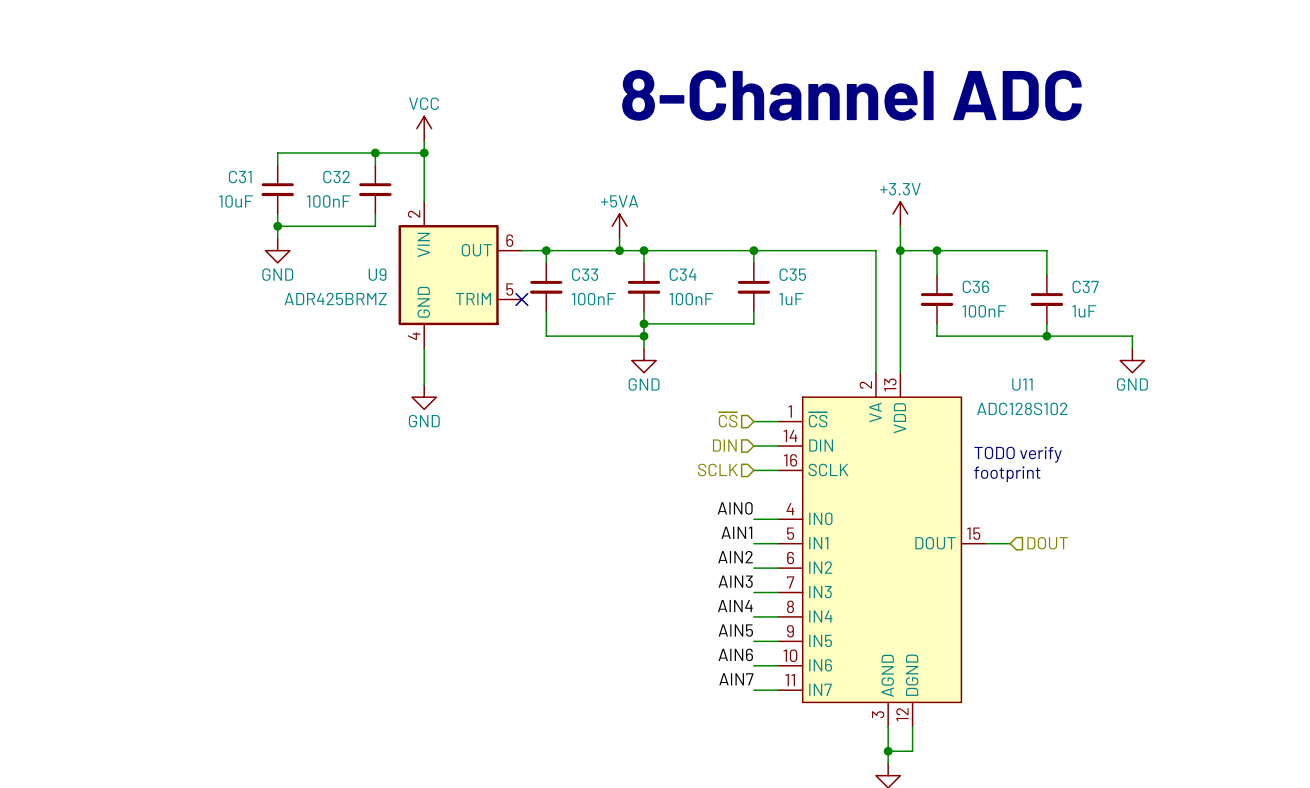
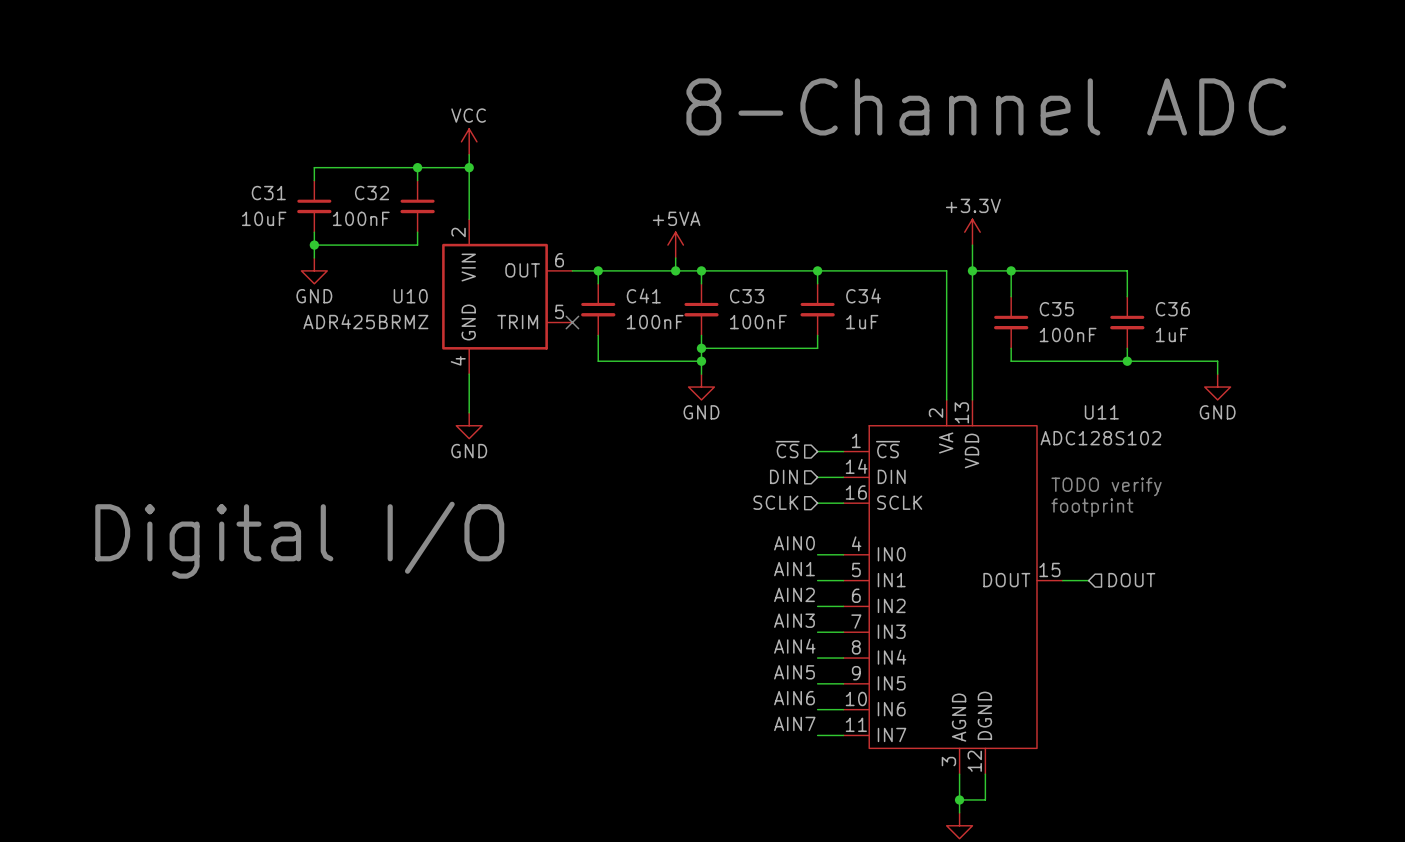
U9 name: U9 (377, 274) -> U10 (410, 296)
C33 name: C33 (585, 274) -> C41 (643, 295)
C34 name: C34 (683, 274) -> C33 (747, 296)
C35 name: C35 (792, 274) -> C34 (863, 295)
C36 name: C36 (975, 286) -> C35 (1056, 309)
C37 name: C37 (1085, 286) -> C36 (1172, 309)
text: none -> Digital I/O (299, 540)

